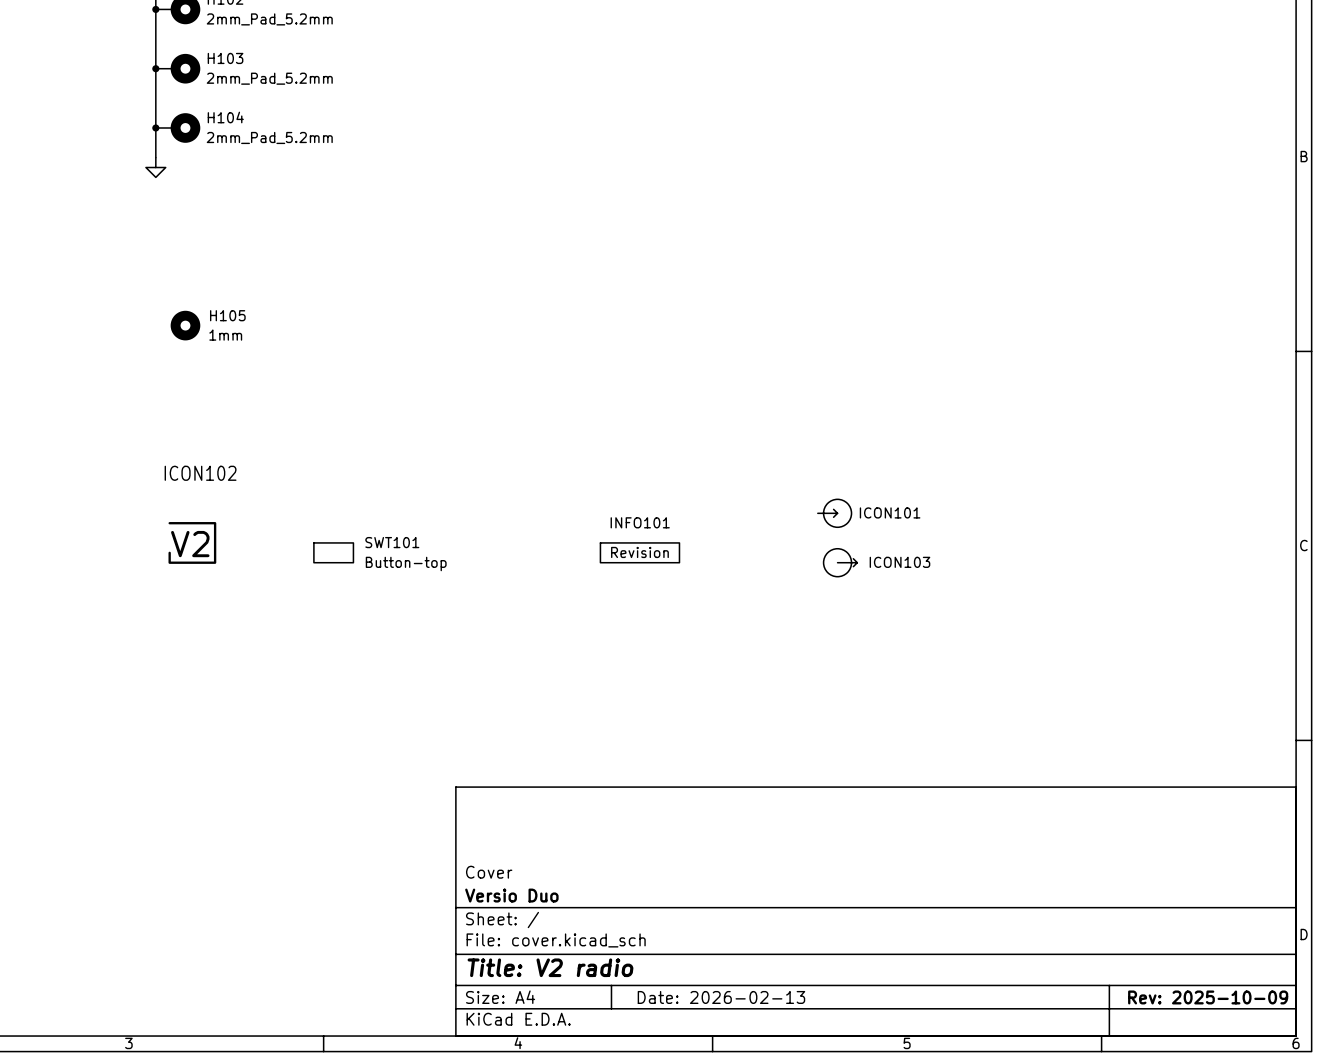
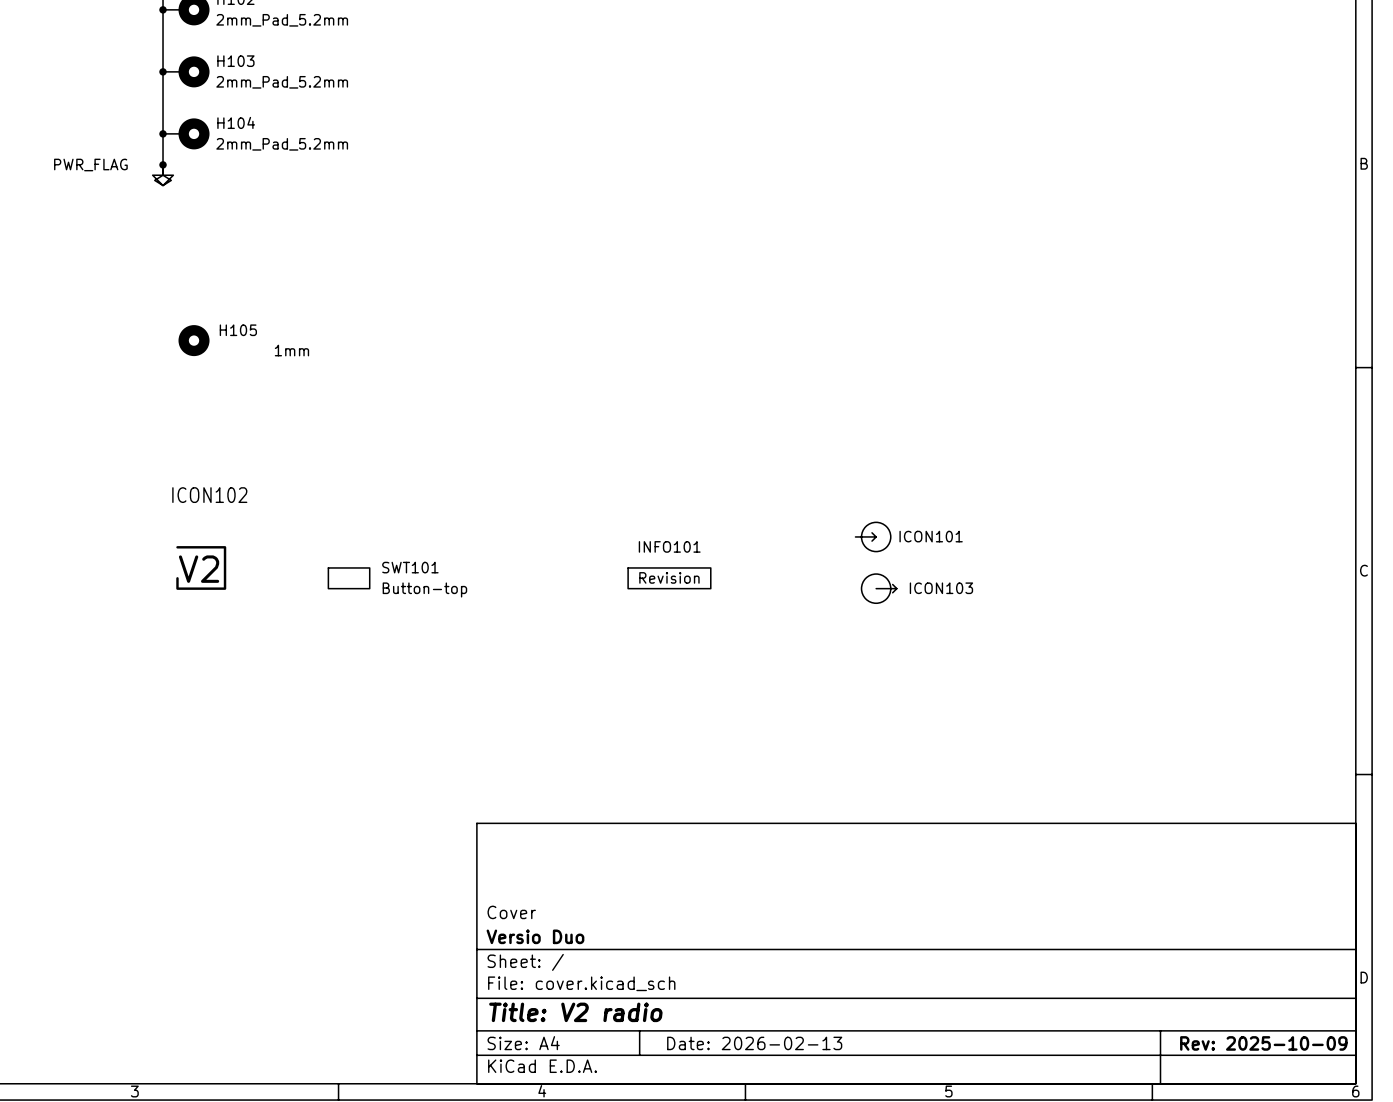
junction: none -> (163, 164)
power symbol: none -> PWR_FLAG (163, 175)
H105 value position: 1mm (225, 335) -> 1mm (291, 350)

